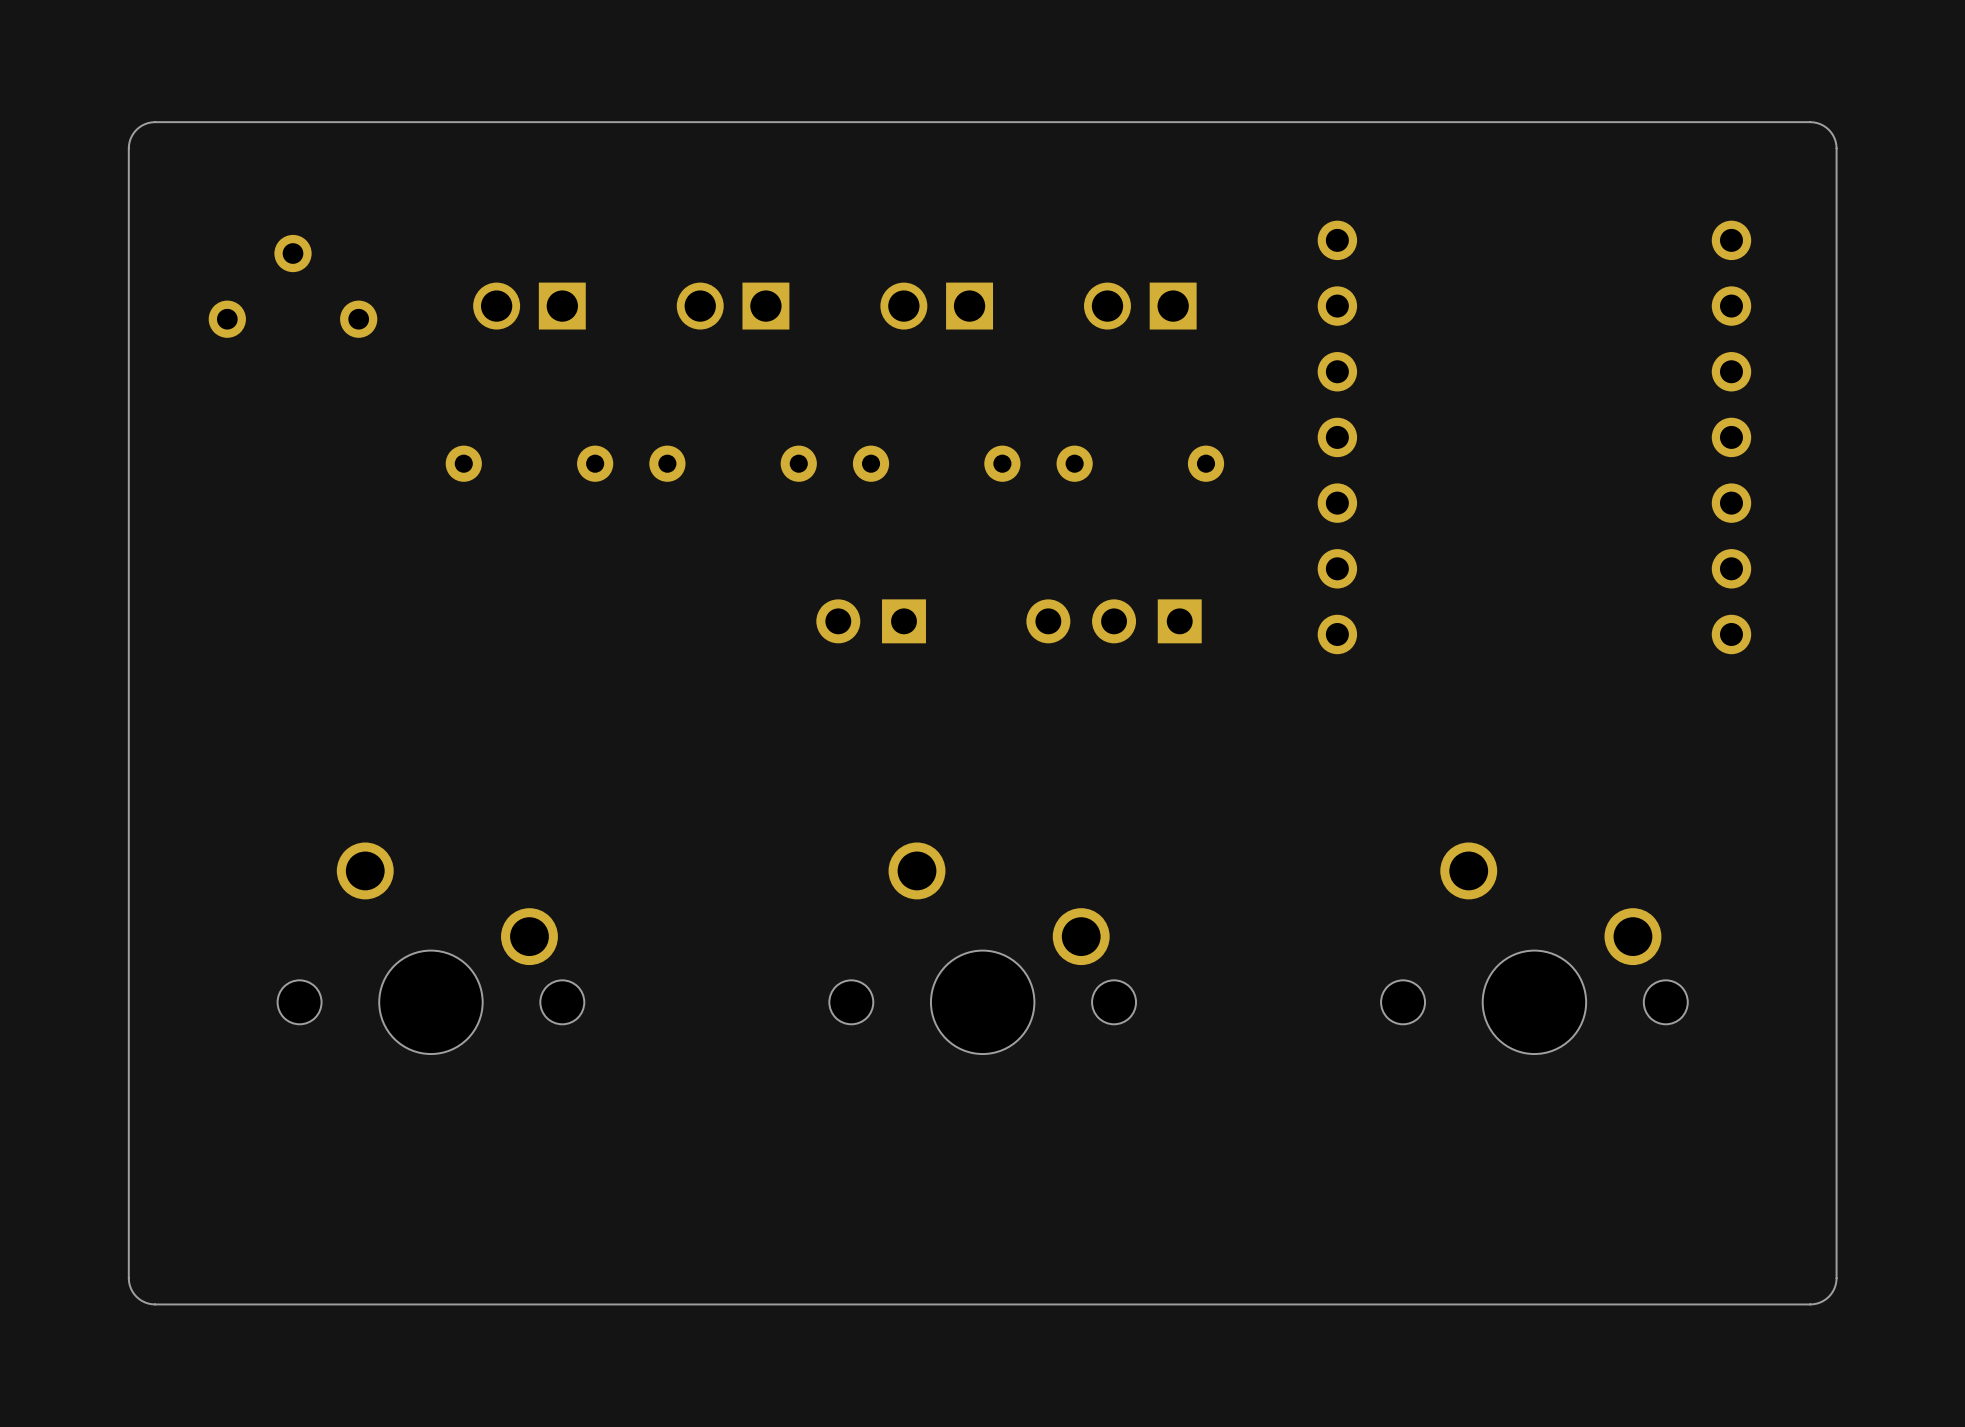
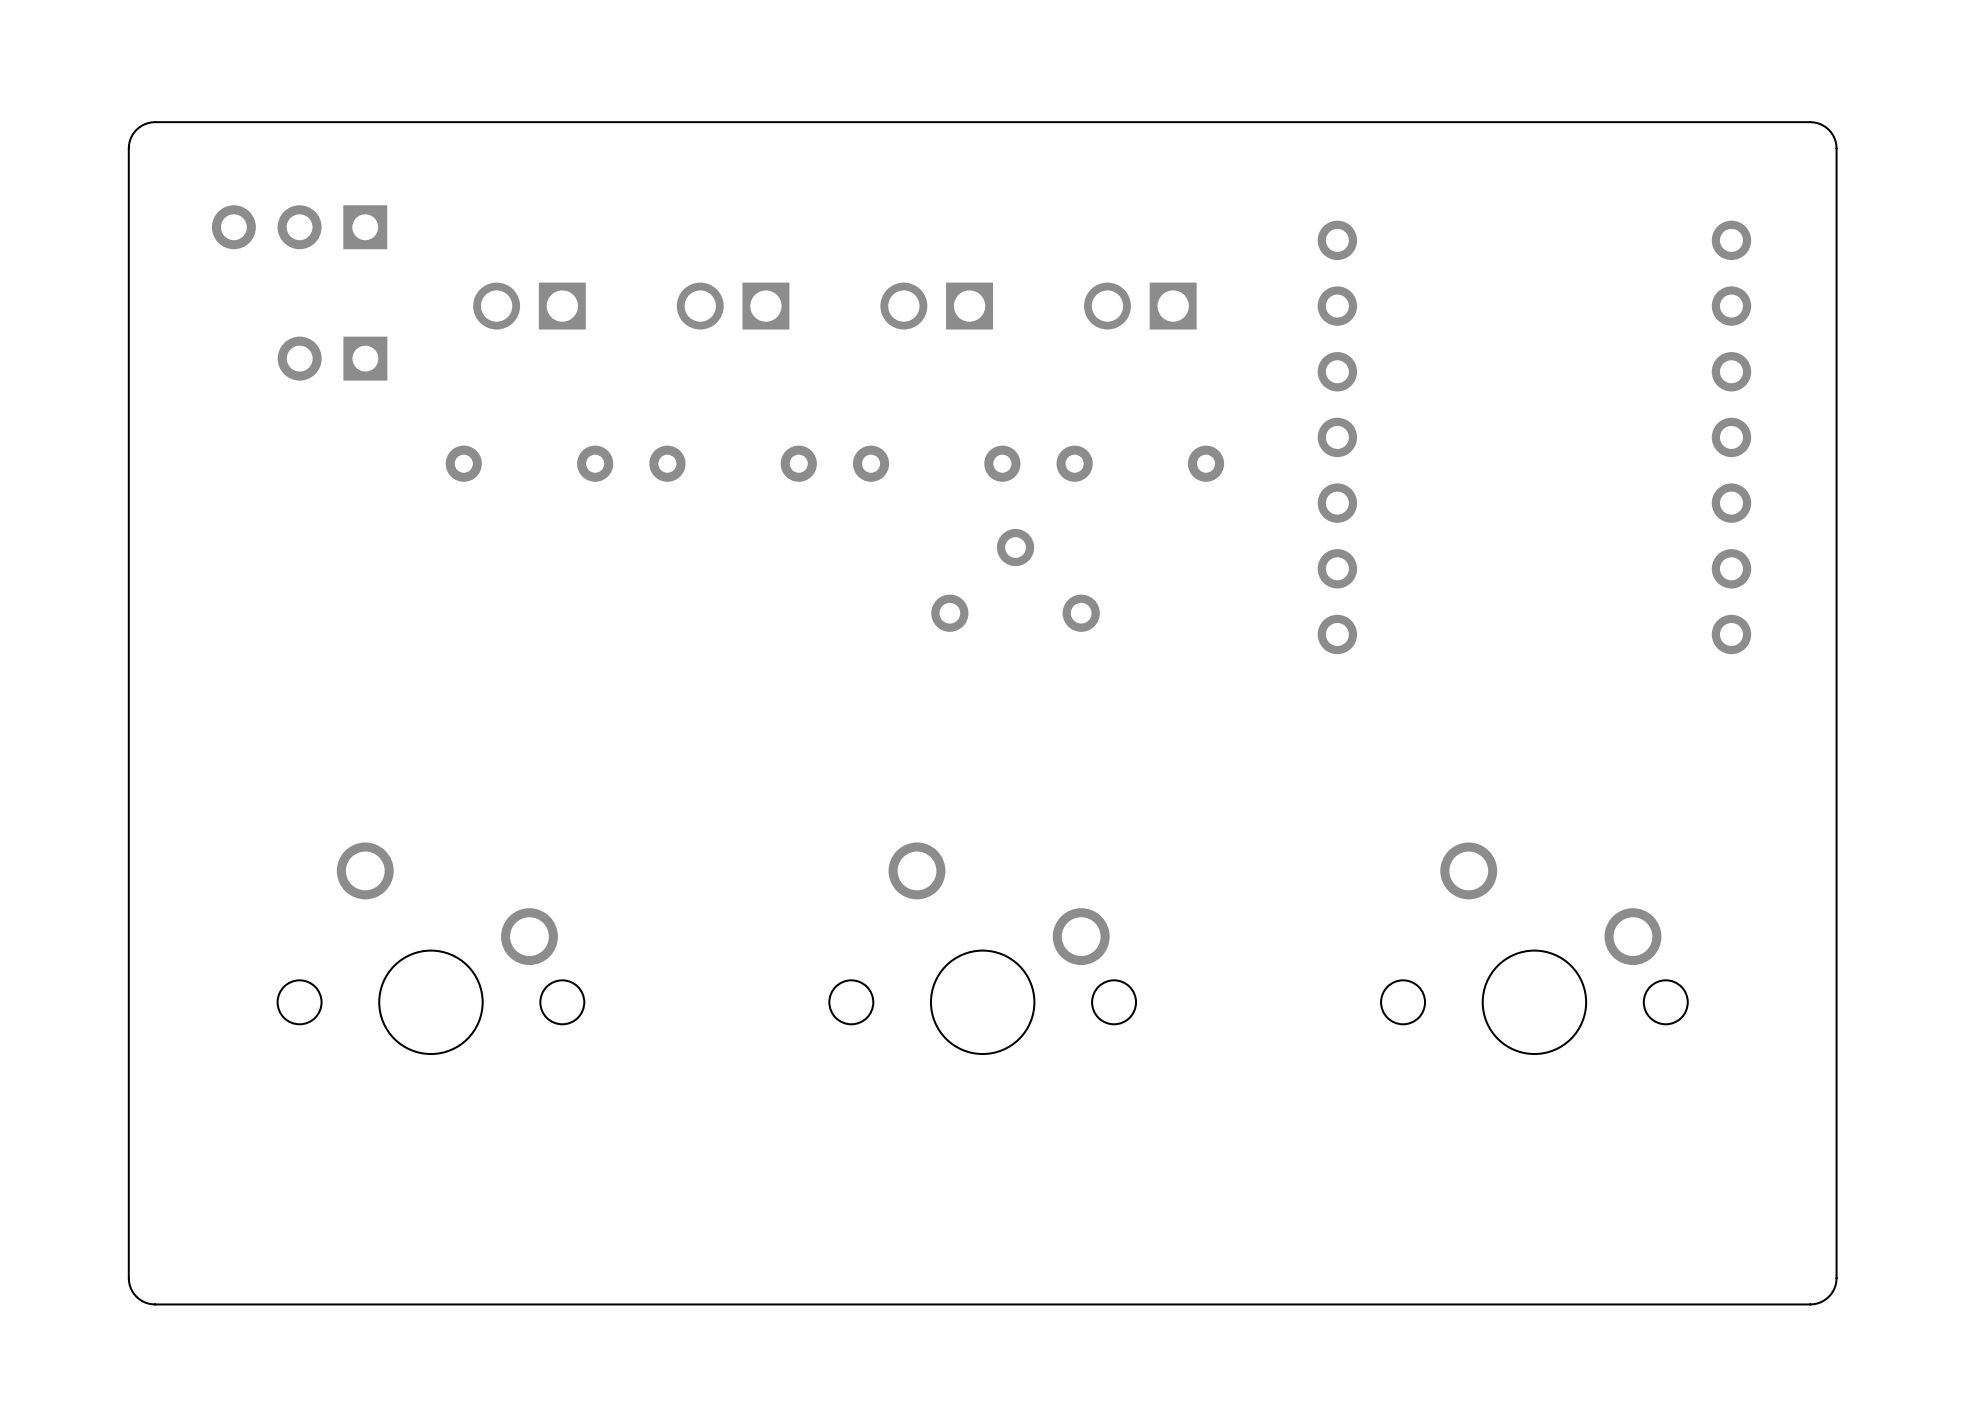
part: none -> (299, 227)
part: (293, 286) -> none
part: none -> (1015, 580)
part position: (871, 621) -> (332, 358)
part: (1114, 621) -> none

